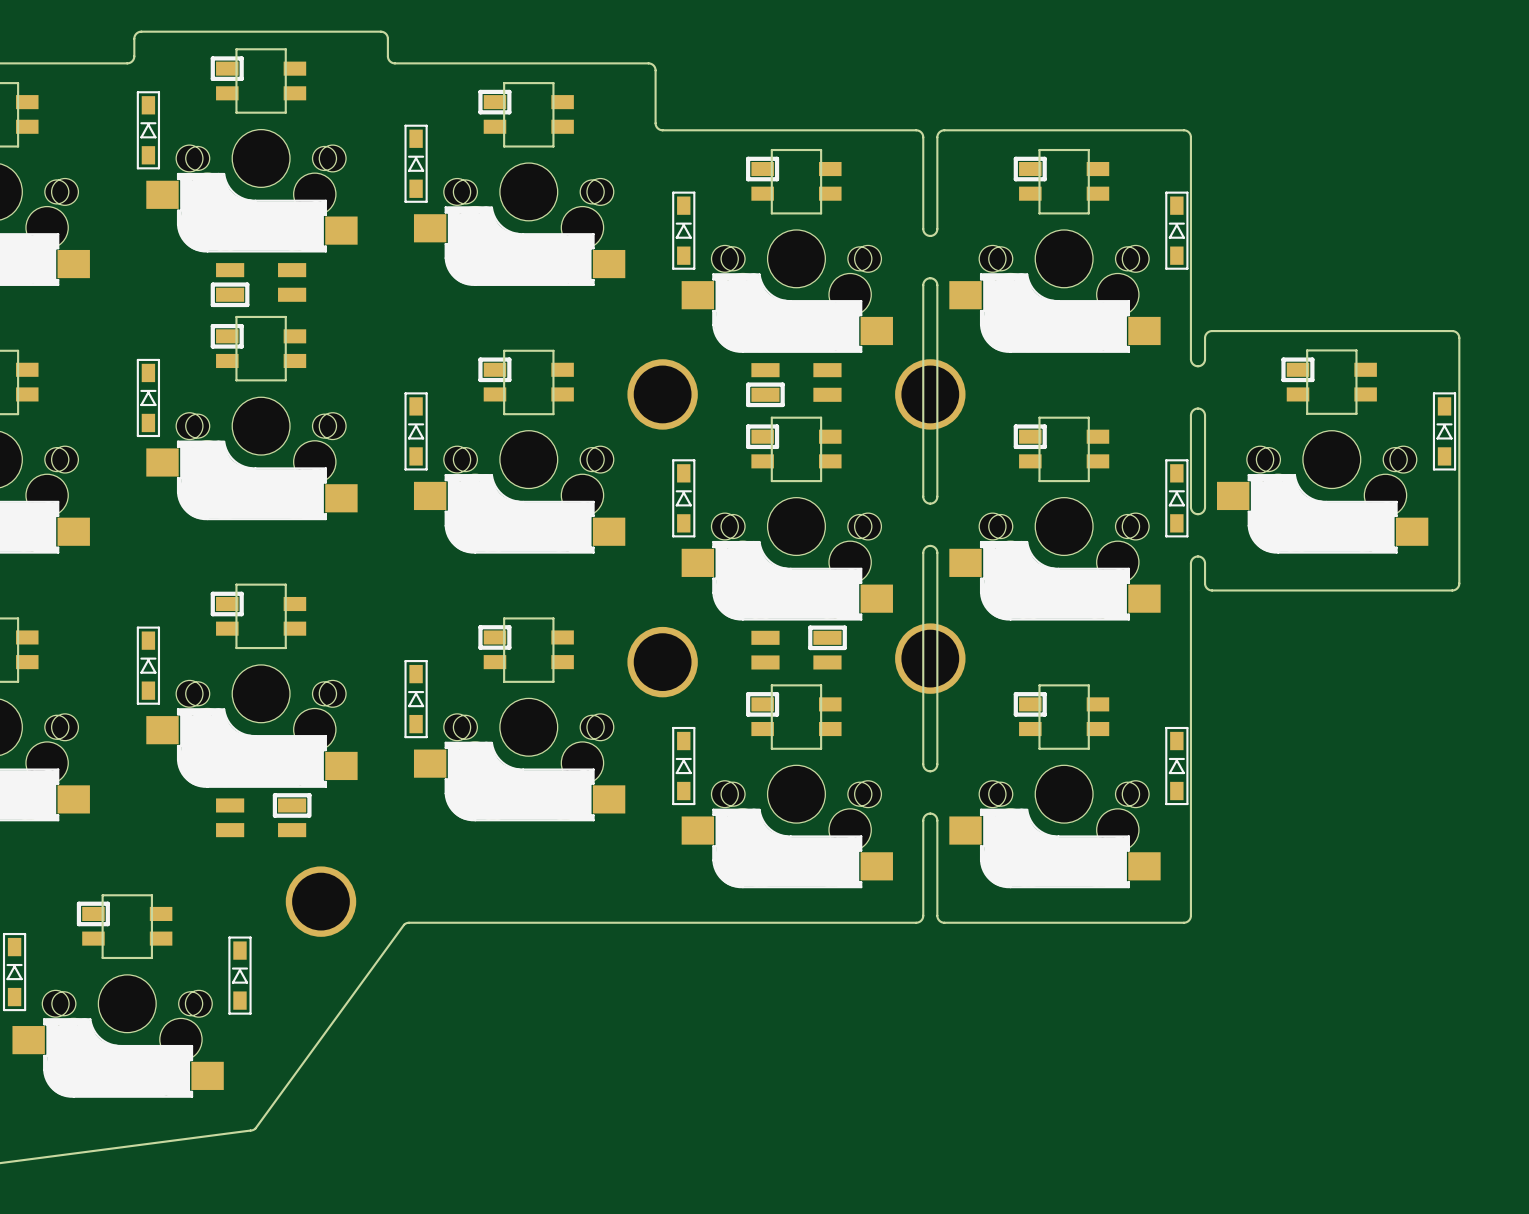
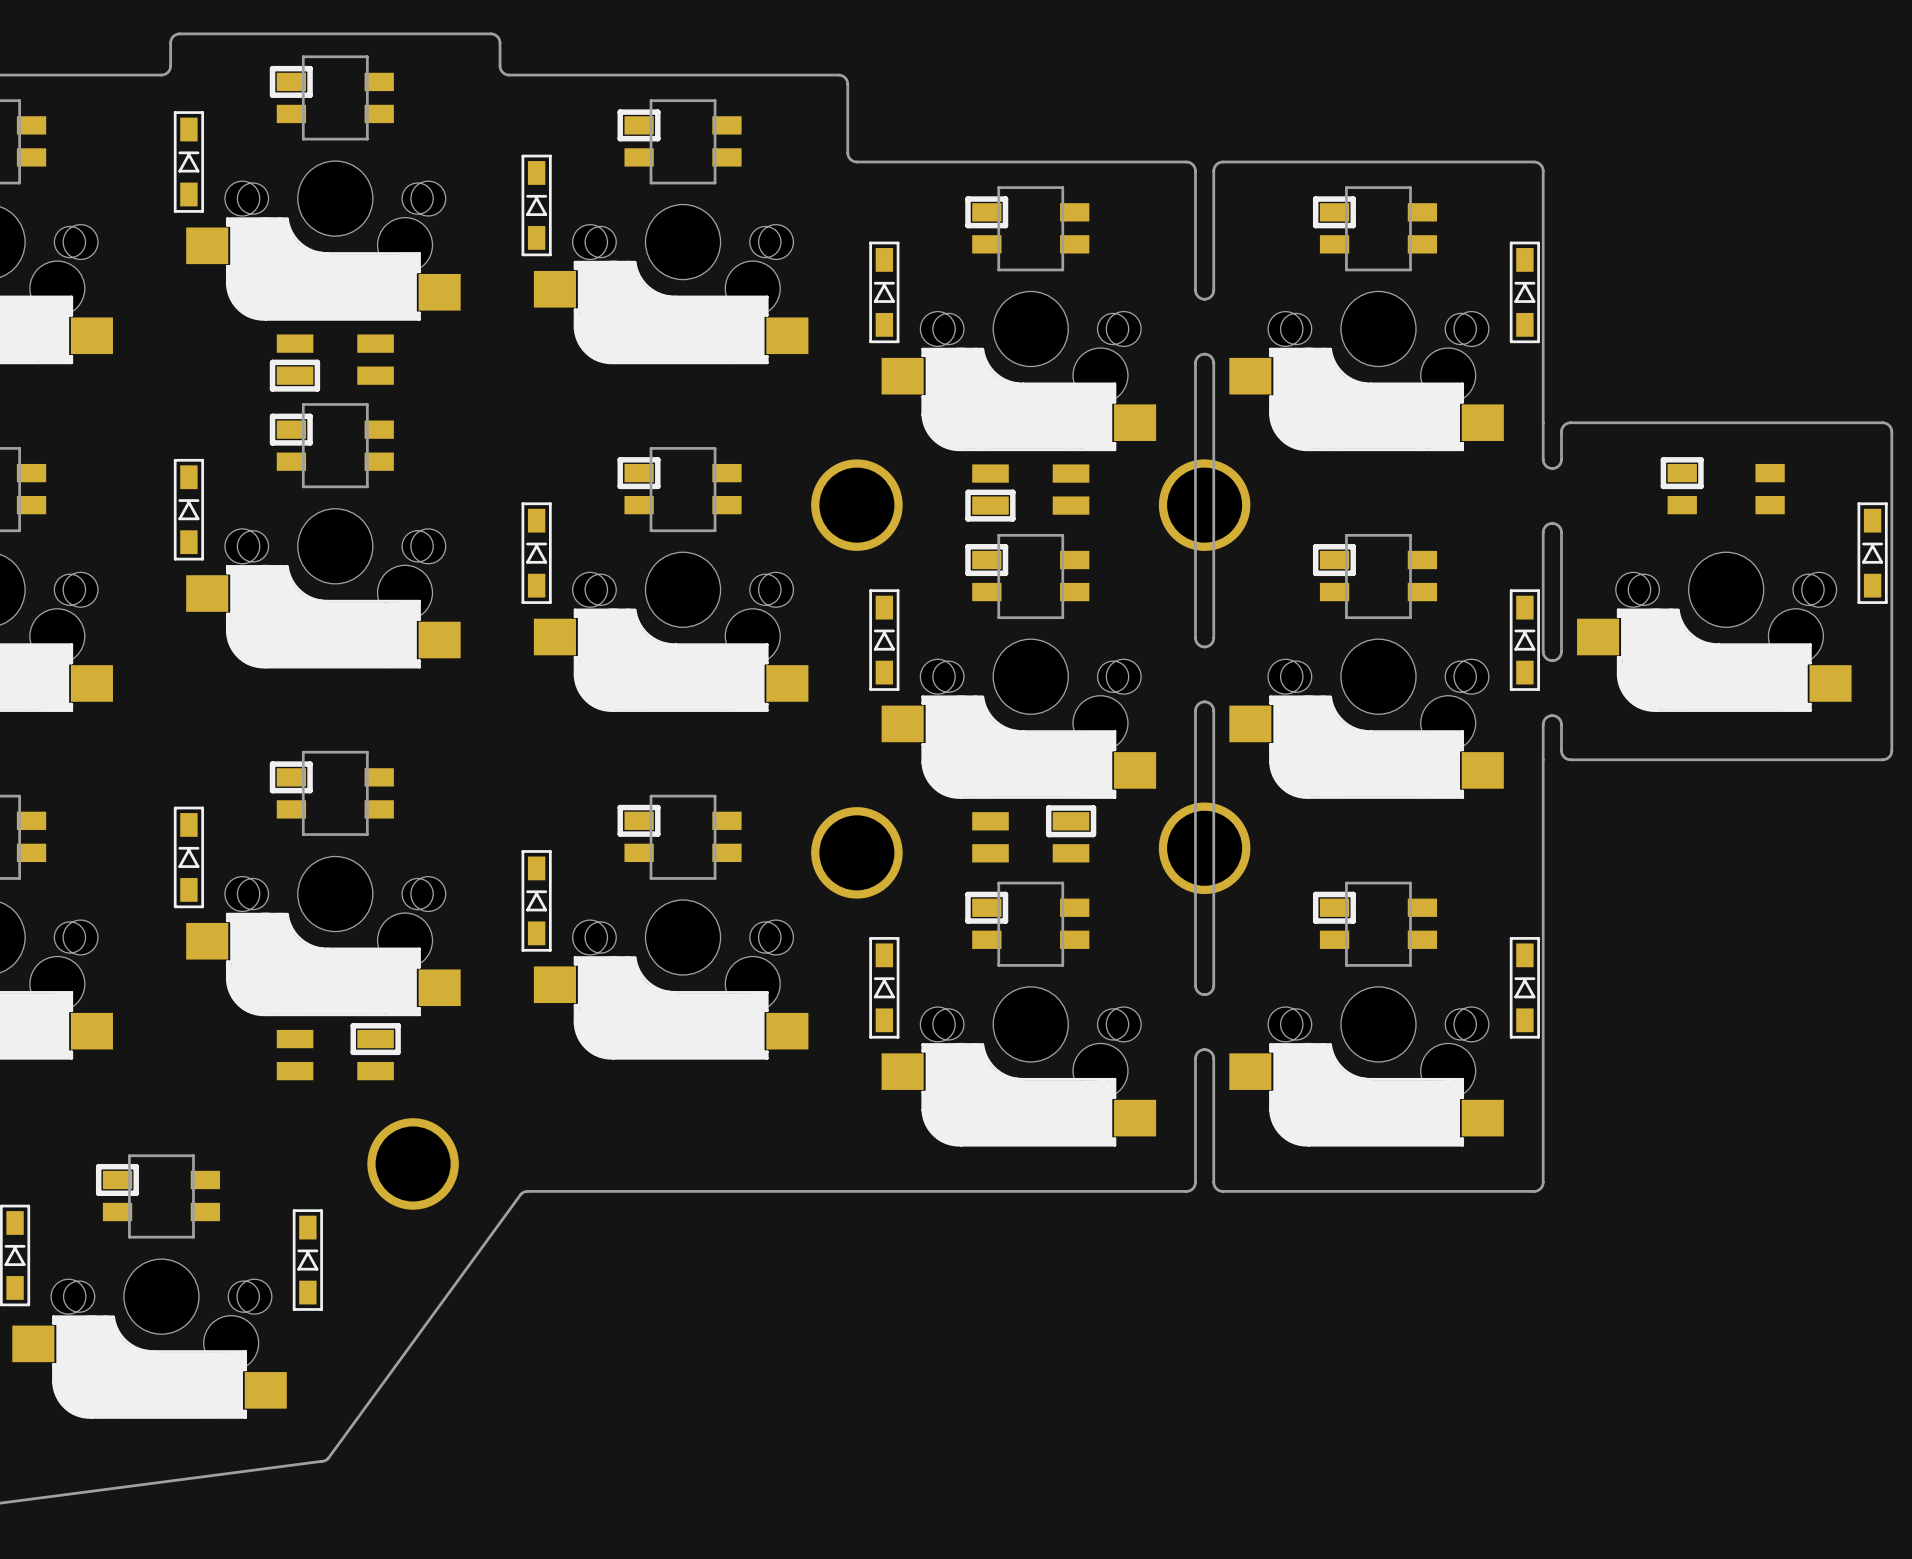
board edge: (1356, 350) (1356, 413) (1307, 413) (1307, 350) (1356, 350) -> none

